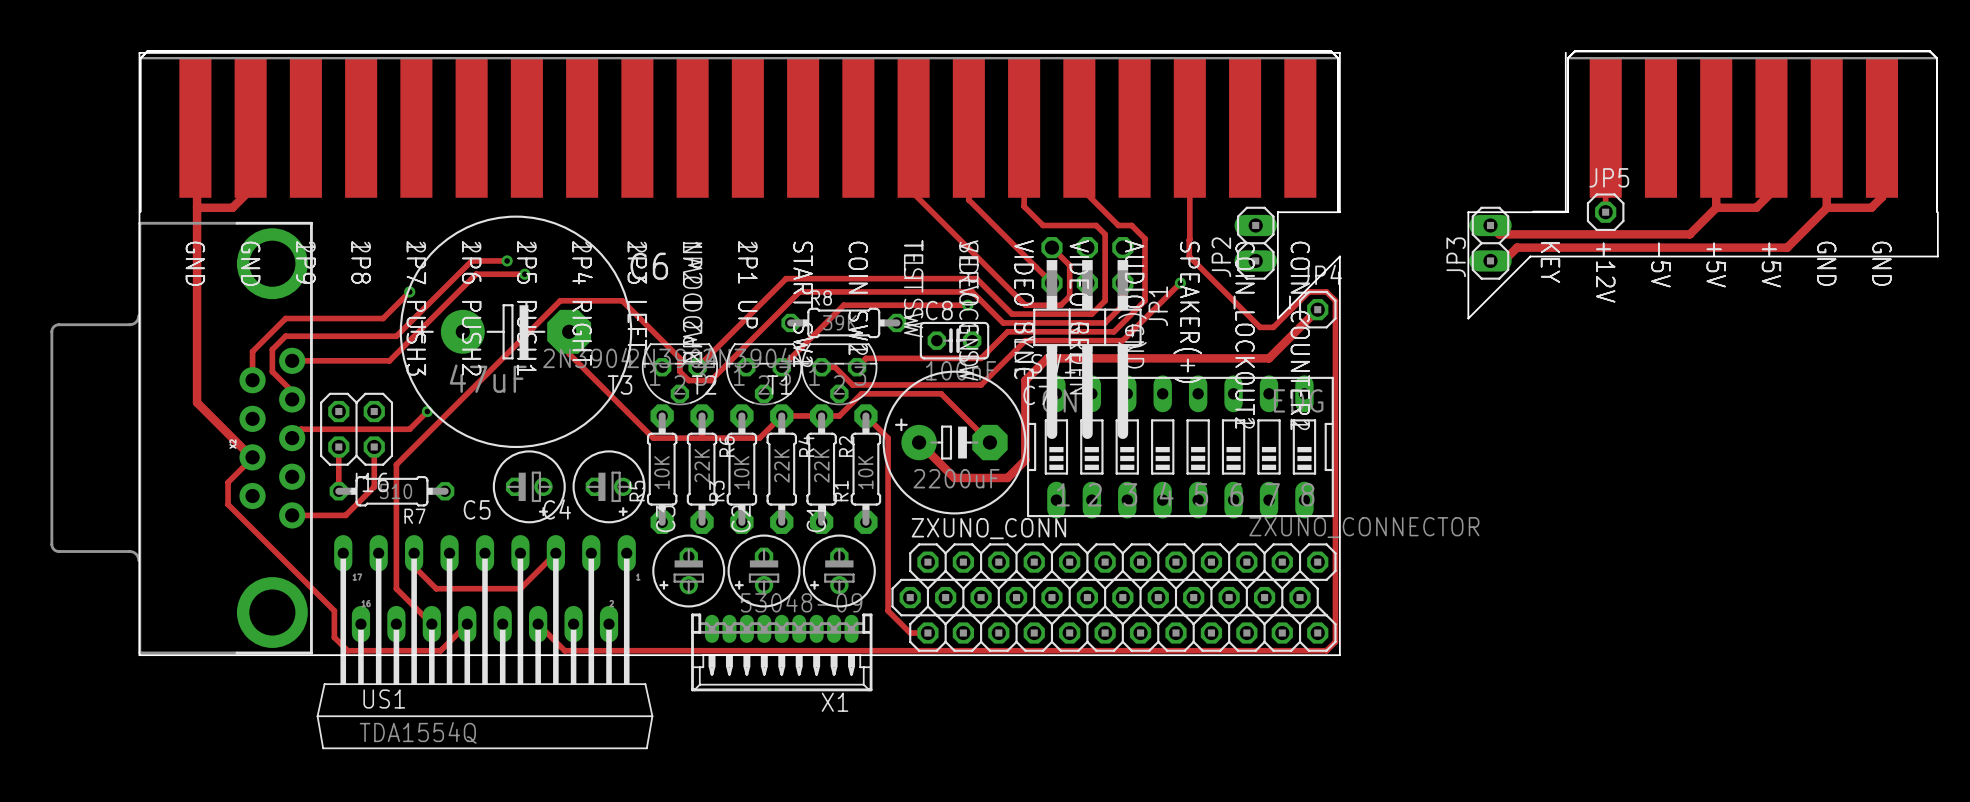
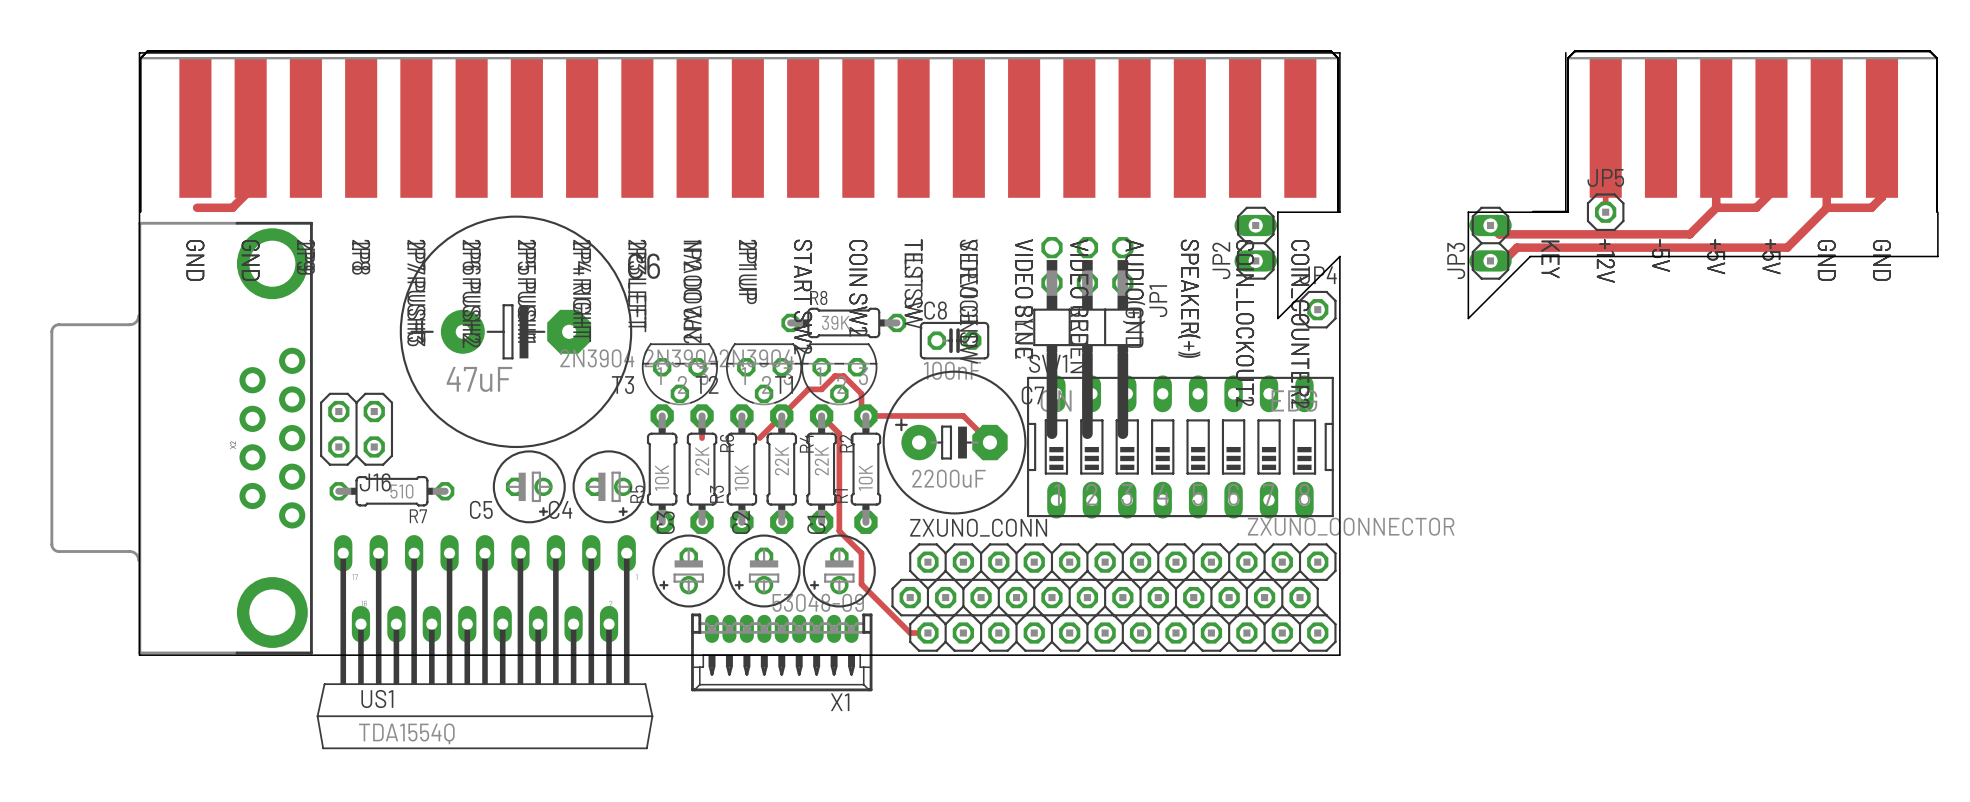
track: (195, 128) (197, 129) (197, 402) (252, 457) (228, 482) (228, 504) (334, 610) (334, 637) (347, 650) (440, 650) (467, 624) -> none
track: (913, 128) (913, 193) (1025, 305) (1060, 305) (1069, 296) (1069, 265) (1051, 247) -> none
track: (968, 128) (968, 199) (1051, 283) -> none
track: (1024, 128) (1024, 206) (1043, 225) (1096, 225) (1105, 234) (1105, 300) (1091, 314) (1012, 314) (976, 278) (786, 278) (697, 367) -> none
track: (1079, 128) (1079, 186) (1118, 225) (1131, 225) (1144, 238) (1144, 300) (1113, 331) (1007, 331) (981, 358) (865, 358) (857, 367) -> none
track: (1189, 128) (1189, 256) (1260, 327) (1273, 327) (1308, 291) (1326, 291) (1335, 300) (1335, 641) (1326, 650) (564, 650) (538, 624) -> none
track: (507, 260) (471, 260) (396, 336) (285, 336) (272, 349) (272, 371) (292, 391) (292, 399) -> none
via: (507, 260) -> none
track: (524, 274) (476, 274) (389, 360) (292, 360) -> none
via: (524, 274) -> none
track: (1122, 283) (1122, 305) (1105, 322) (1003, 322) (972, 291) (799, 291) (710, 380) (688, 380) (679, 371) (679, 358) (622, 300) (560, 300) (396, 464) (396, 588) (431, 624) -> none
track: (1180, 283) (1122, 340) (1025, 340) (981, 384) (852, 384) -> none
via: (1180, 283) -> none
track: (409, 291) (383, 318) (285, 318) (252, 351) (252, 380) -> none
via: (409, 291) -> none
track: (967, 305) (843, 305) (781, 367) -> none
via: (967, 305) -> none
track: (1317, 309) (1269, 358) (1047, 358) (1025, 380) (1025, 460) (1007, 477) (954, 477) (919, 442) -> none
track: (569, 331) (569, 353) (653, 438) (759, 438) -> none
track: (821, 367) (834, 367) (843, 376) -> (781, 415) (808, 389) (821, 389) (834, 376) (843, 376)
track: (427, 411) (409, 429) (301, 429) (292, 438) -> none
via: (427, 411) -> none
track: (781, 415) (839, 415) (861, 393) (941, 393) (963, 415) -> (852, 384) (861, 393) (861, 415) (963, 415)
track: (865, 415) (888, 438) (888, 610) -> (821, 415) (839, 433) (839, 531) (861, 553) (861, 584) (888, 610)
track: (338, 446) (338, 491) -> none
track: (374, 446) (374, 486) (345, 515) (292, 515) -> none
track: (414, 553) (414, 566) (436, 588) (520, 588) (555, 553) -> none

